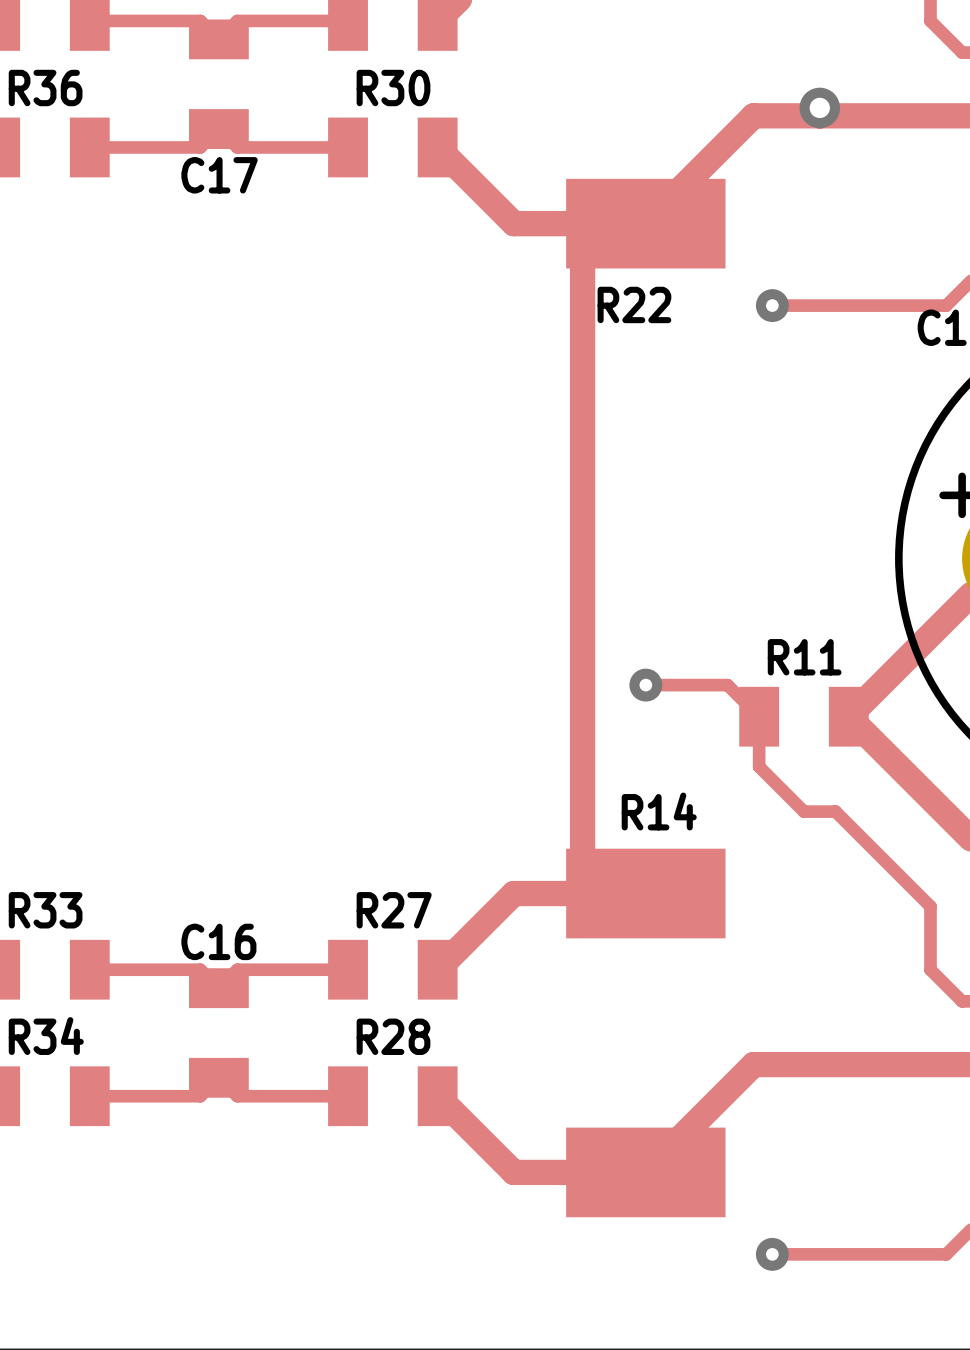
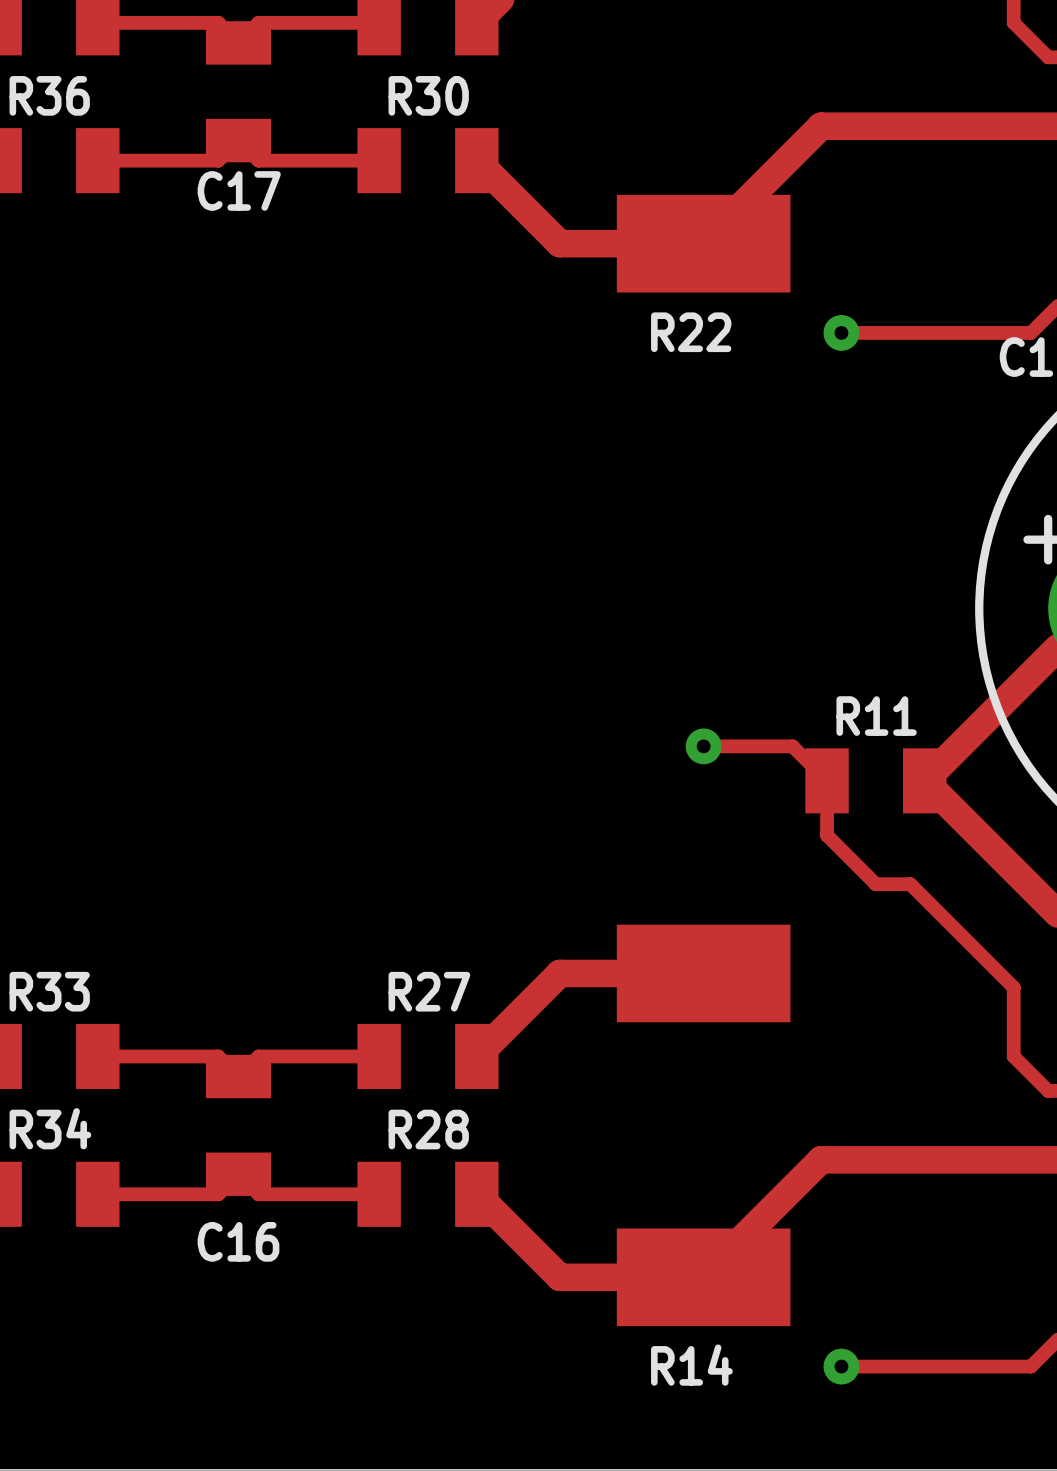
via: (819, 107) -> none
track: (645, 223) (582, 234) (582, 882) (645, 893) -> none
R14 name position: R14 (659, 811) -> R14 (691, 1365)
C16 name position: C16 (218, 941) -> C16 (238, 1241)

